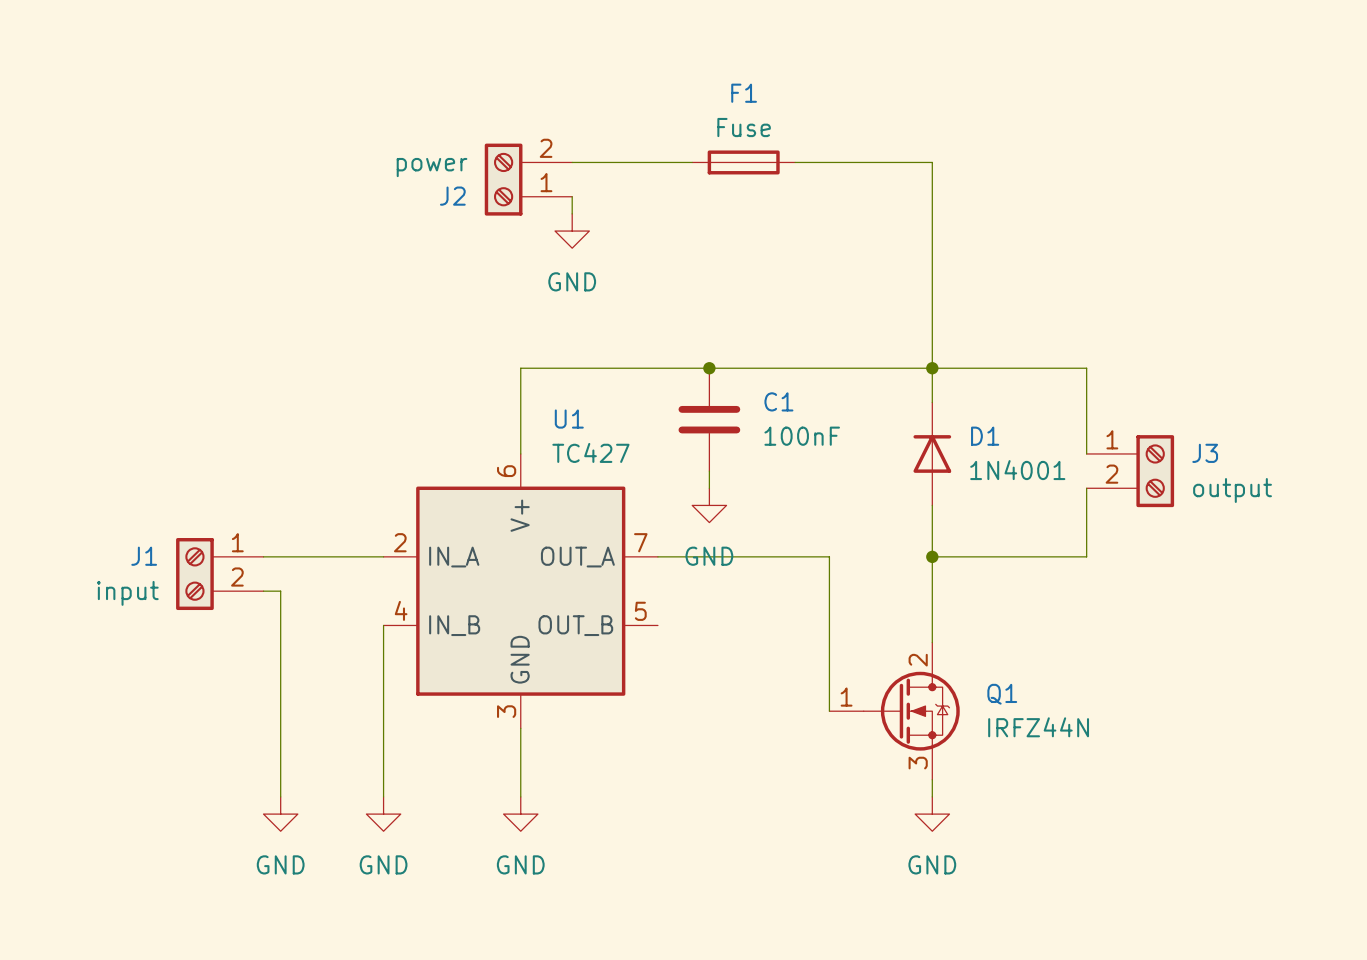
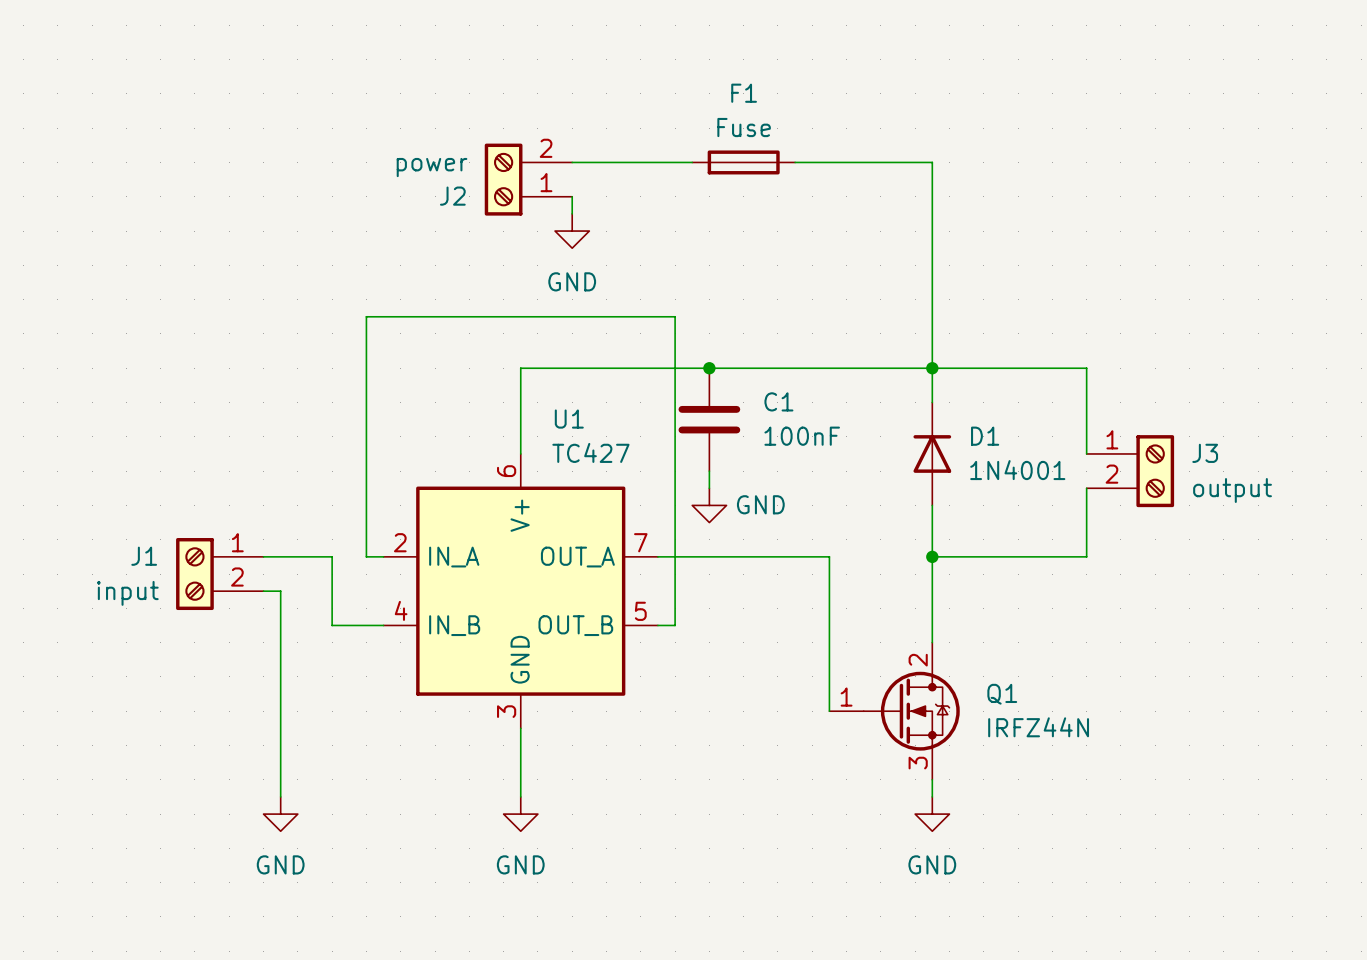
wire: (332, 556) (366, 556) -> (332, 556) (332, 625) (383, 625)
wire: none -> (366, 556) (366, 316) (675, 316) (675, 625) (657, 625)
power symbol text position: GND (709, 556) -> GND (760, 504)
wire: (383, 625) (383, 796) -> none
power symbol: GND (383, 814) -> none

